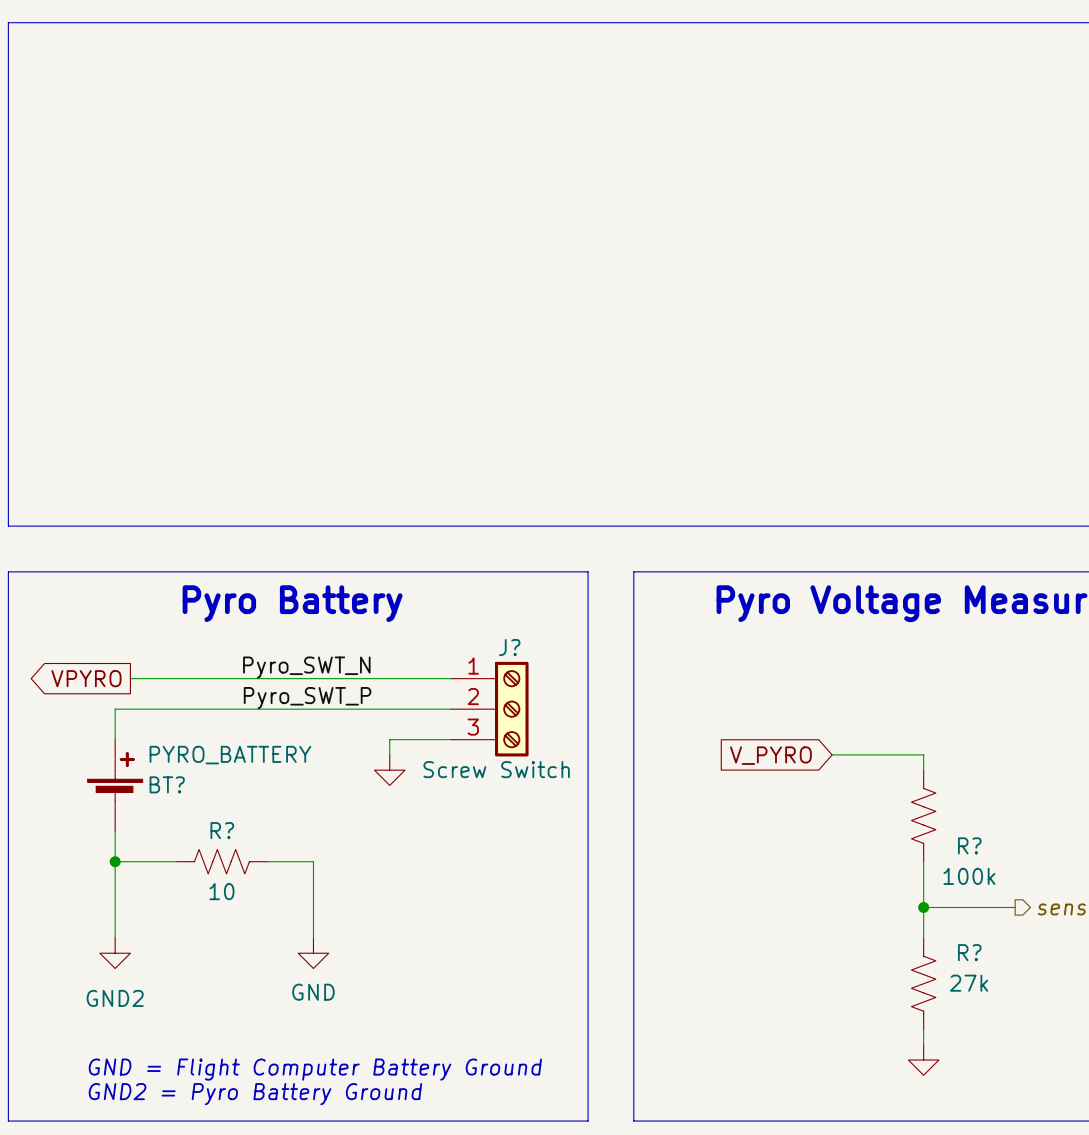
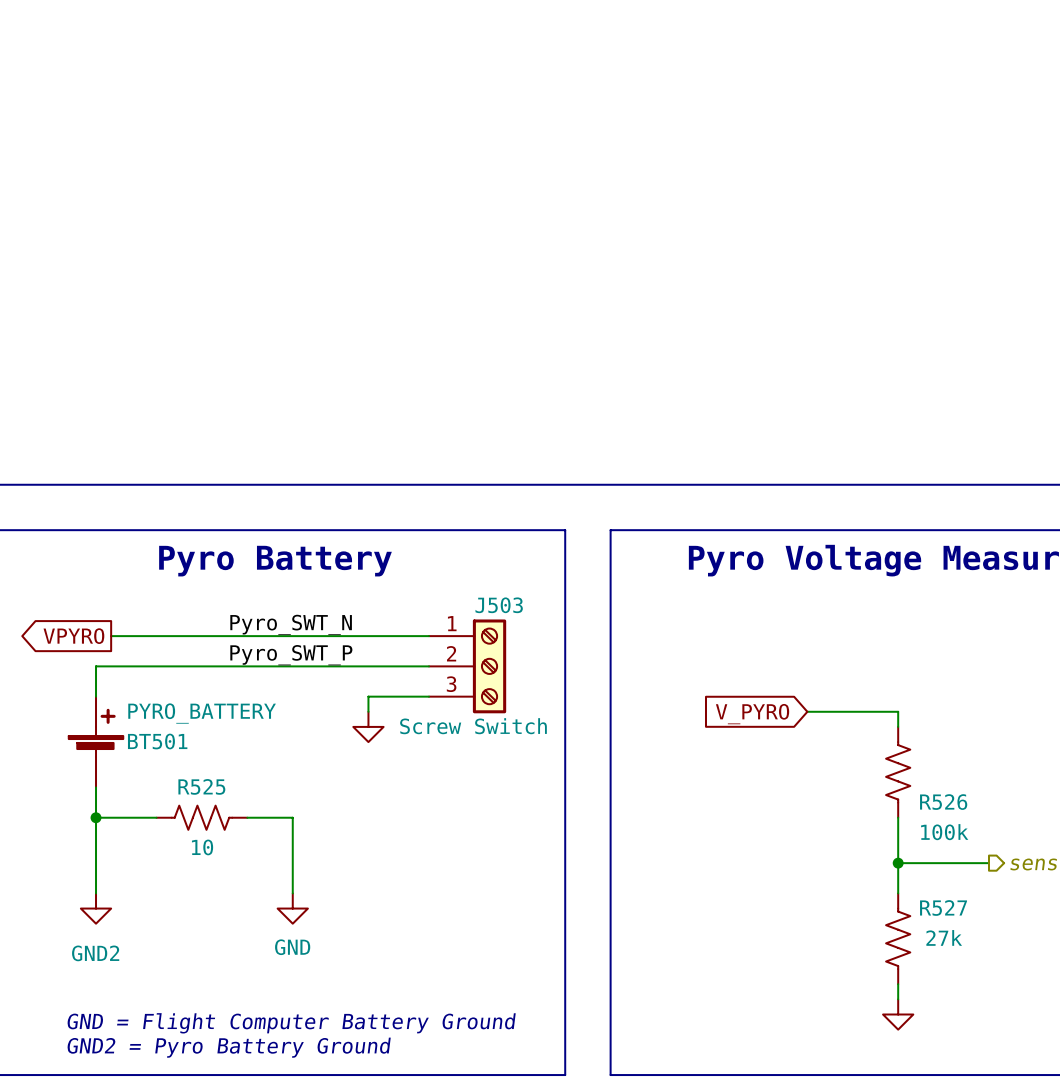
J? name: J? (509, 647) -> J503 (499, 605)
BT? name: BT? (167, 784) -> BT501 (157, 741)
R? name: R? (222, 830) -> R525 (201, 786)
R? name: R? (969, 845) -> R526 (943, 802)
R? name: R? (969, 952) -> R527 (943, 907)

